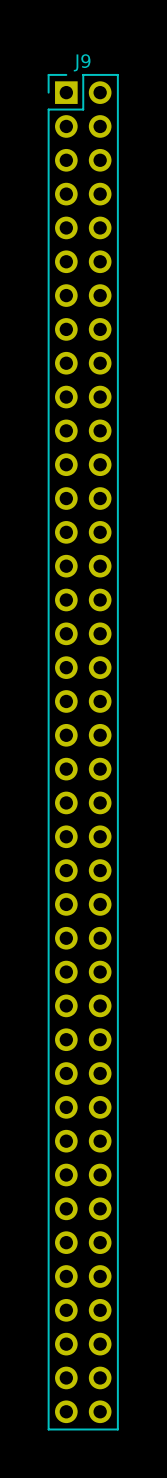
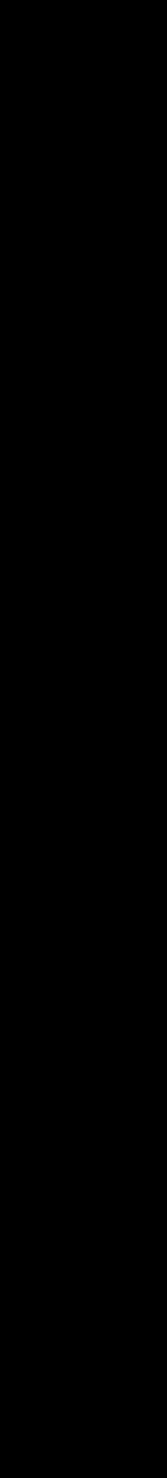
J9: (83, 752) -> none

